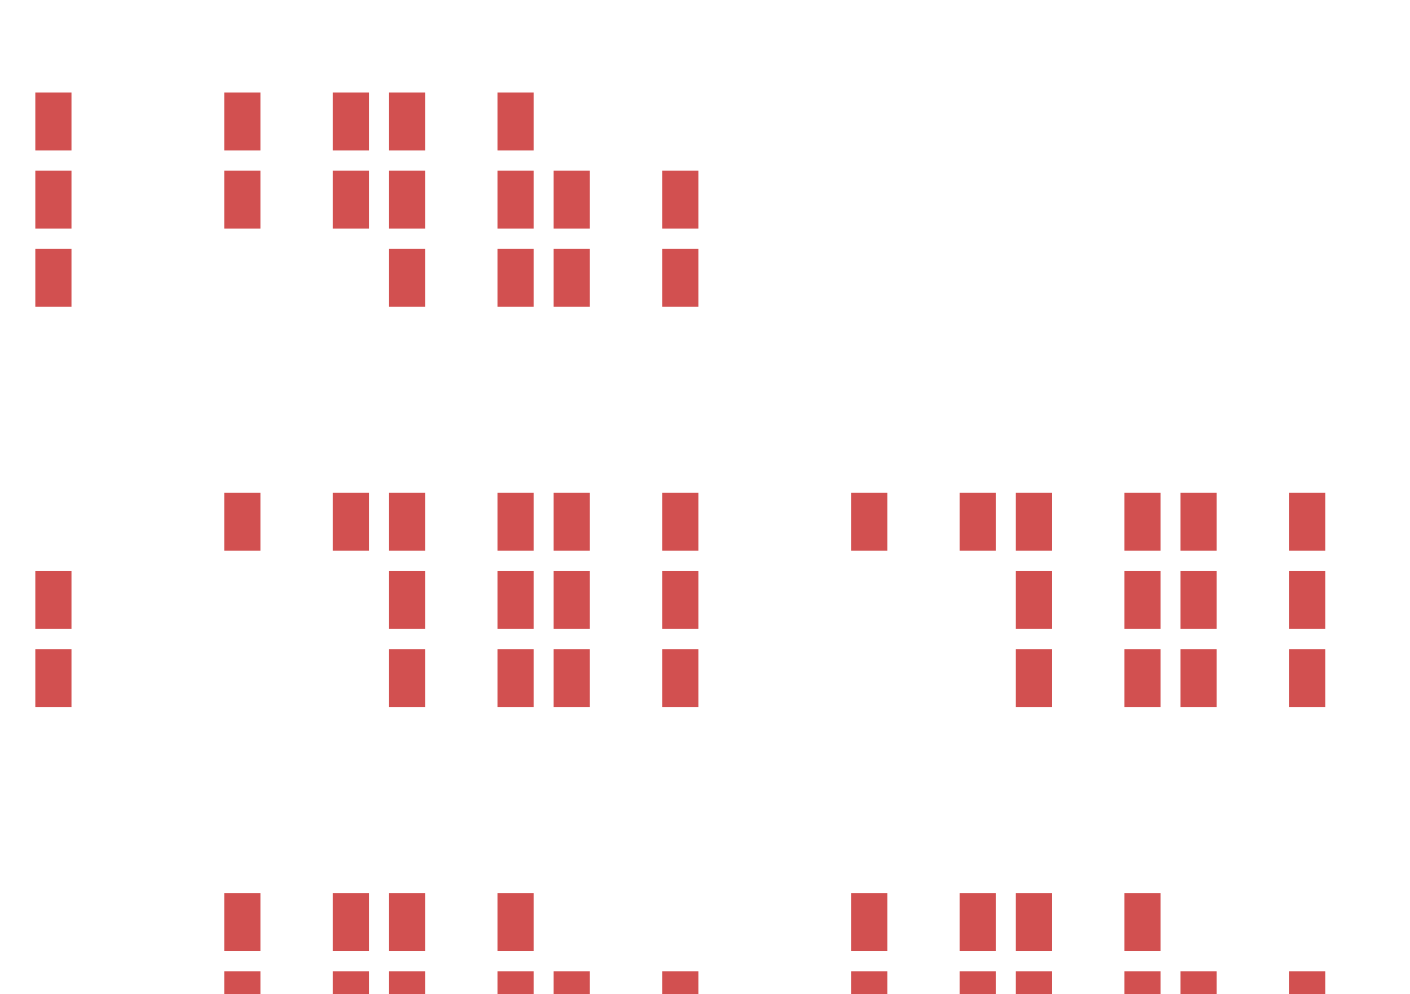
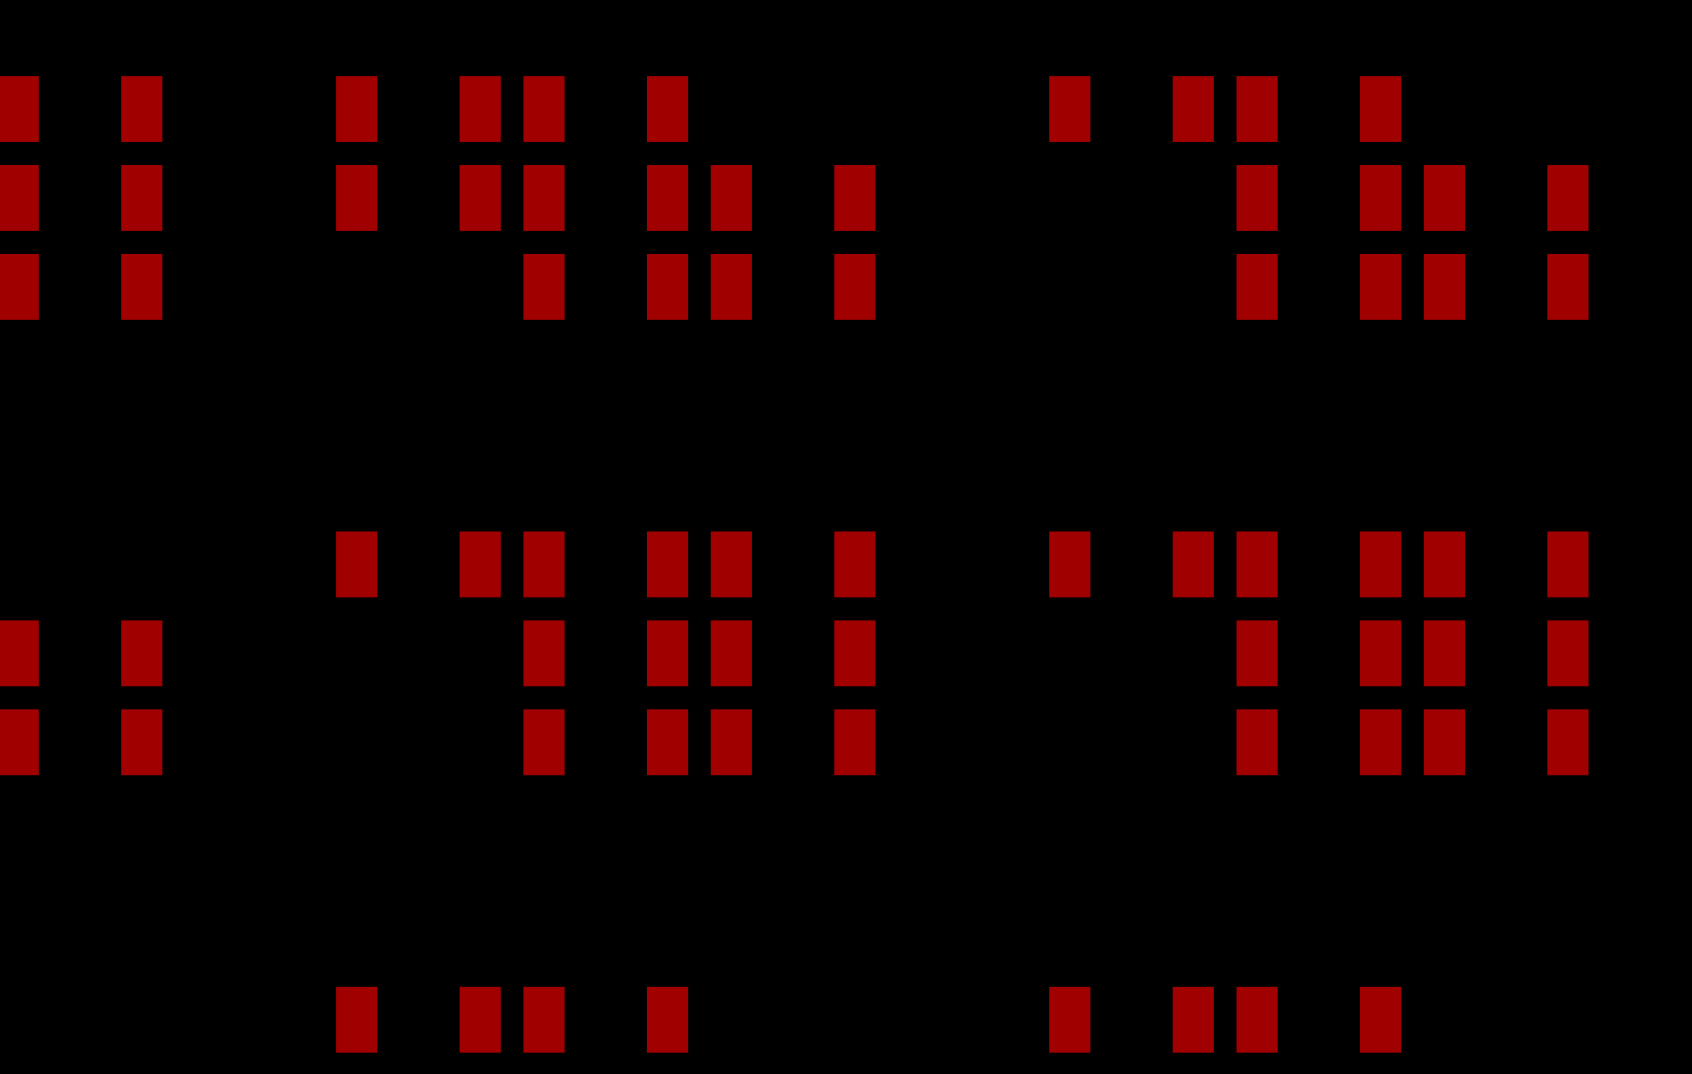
part: none -> (1131, 109)
part: none -> (1318, 109)
part: none -> (1318, 197)
part: none -> (1506, 197)
part: none -> (1318, 286)
part: none -> (1506, 286)

